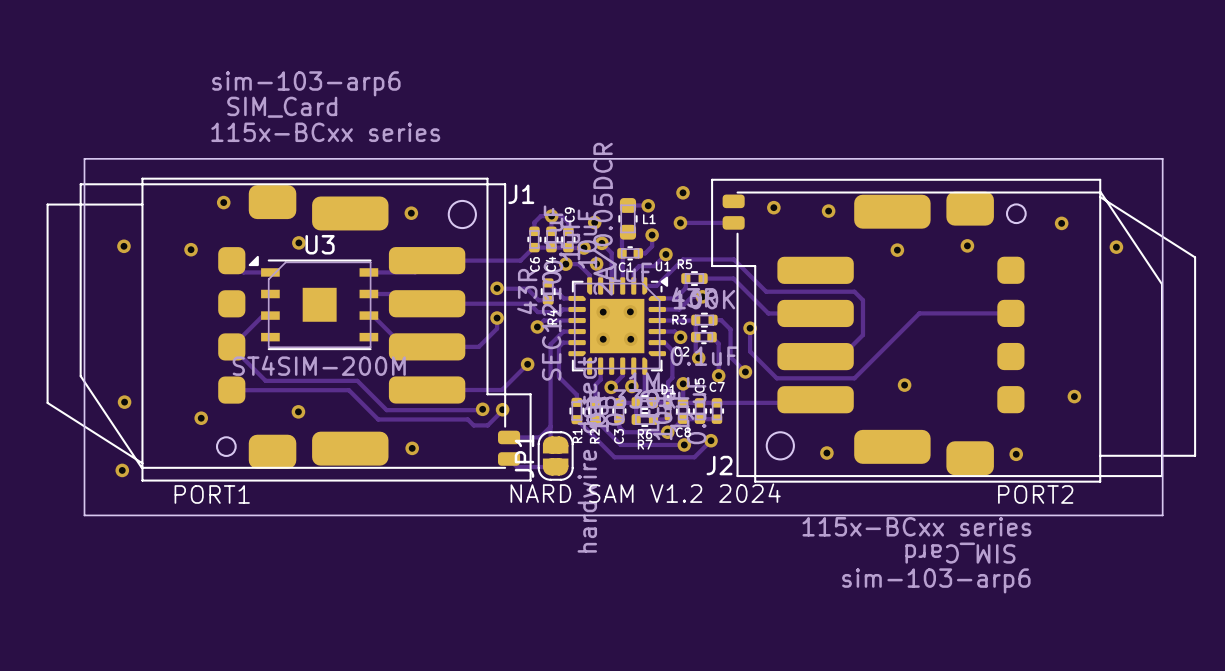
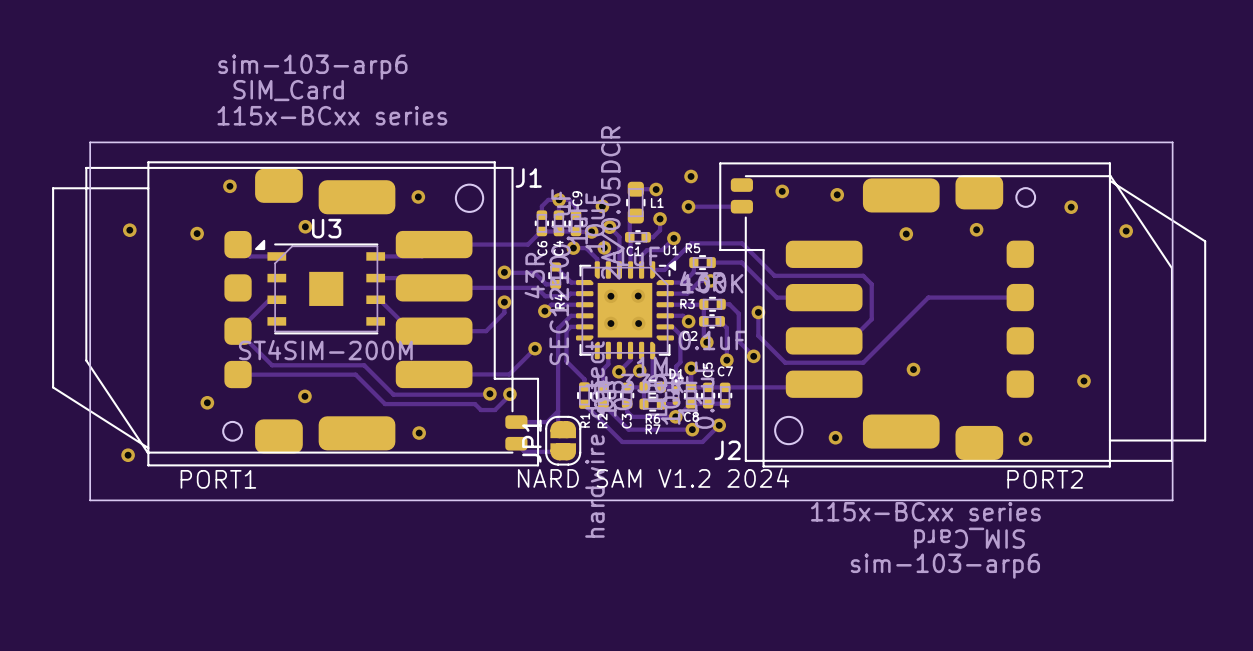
via: (124, 402) -> none

